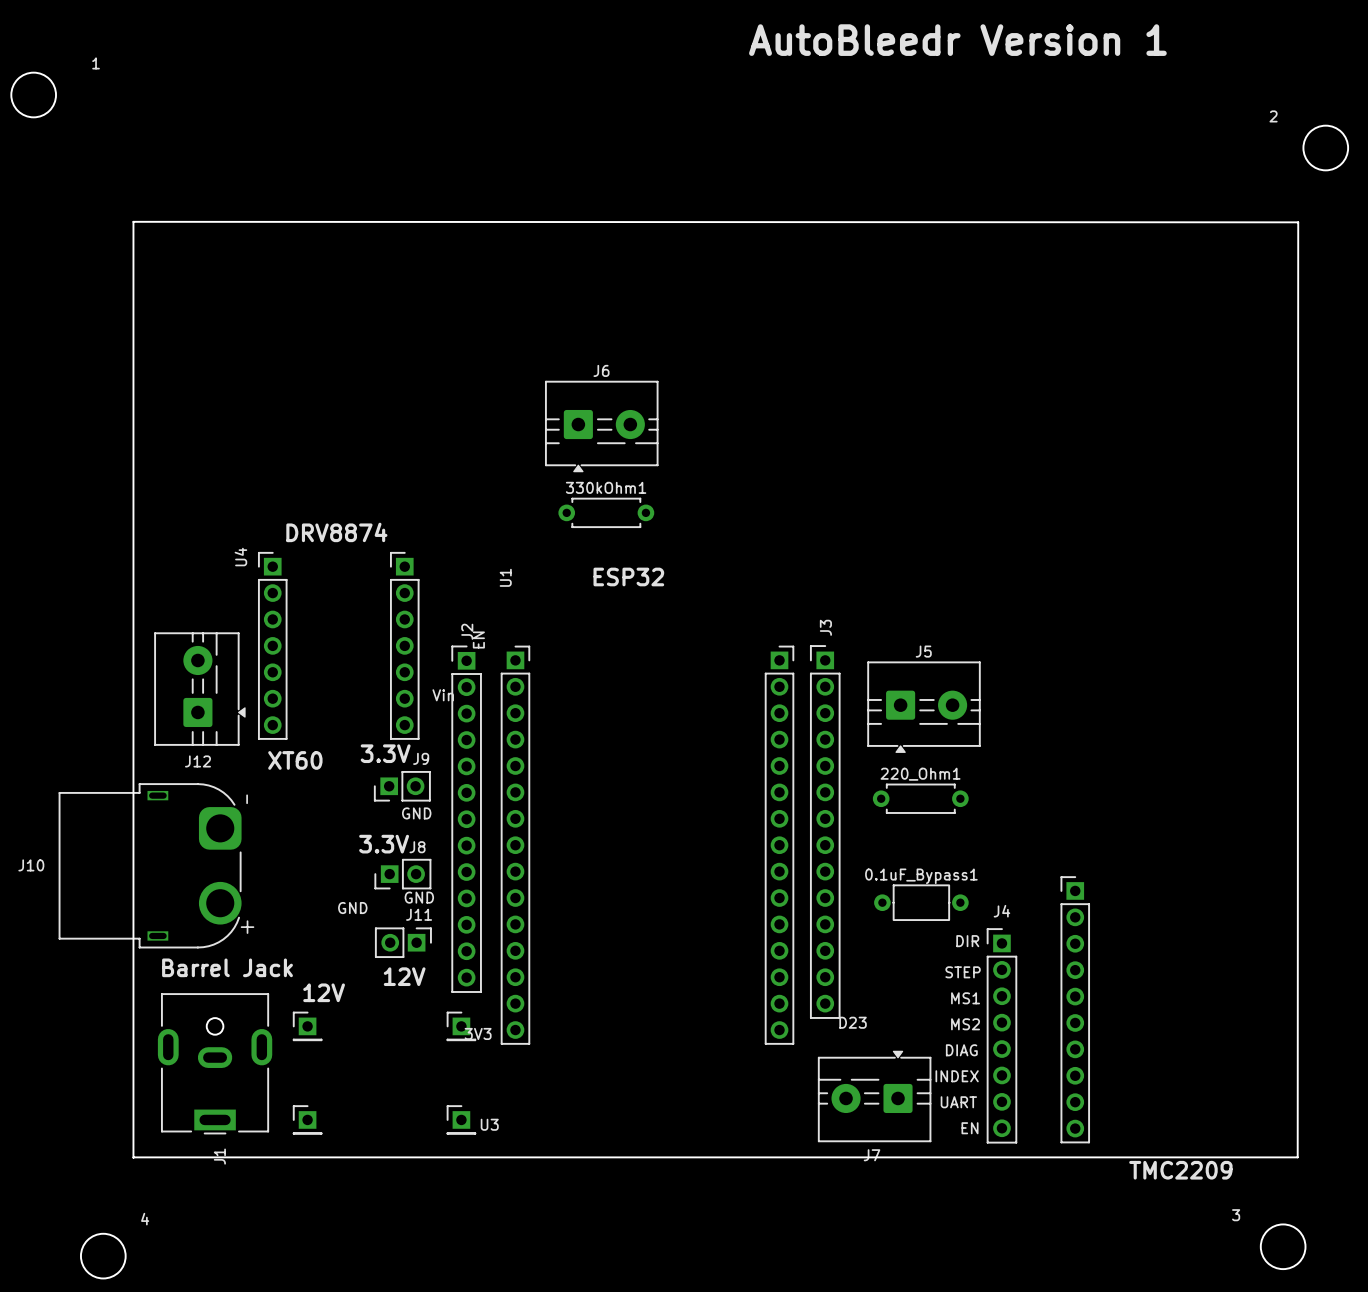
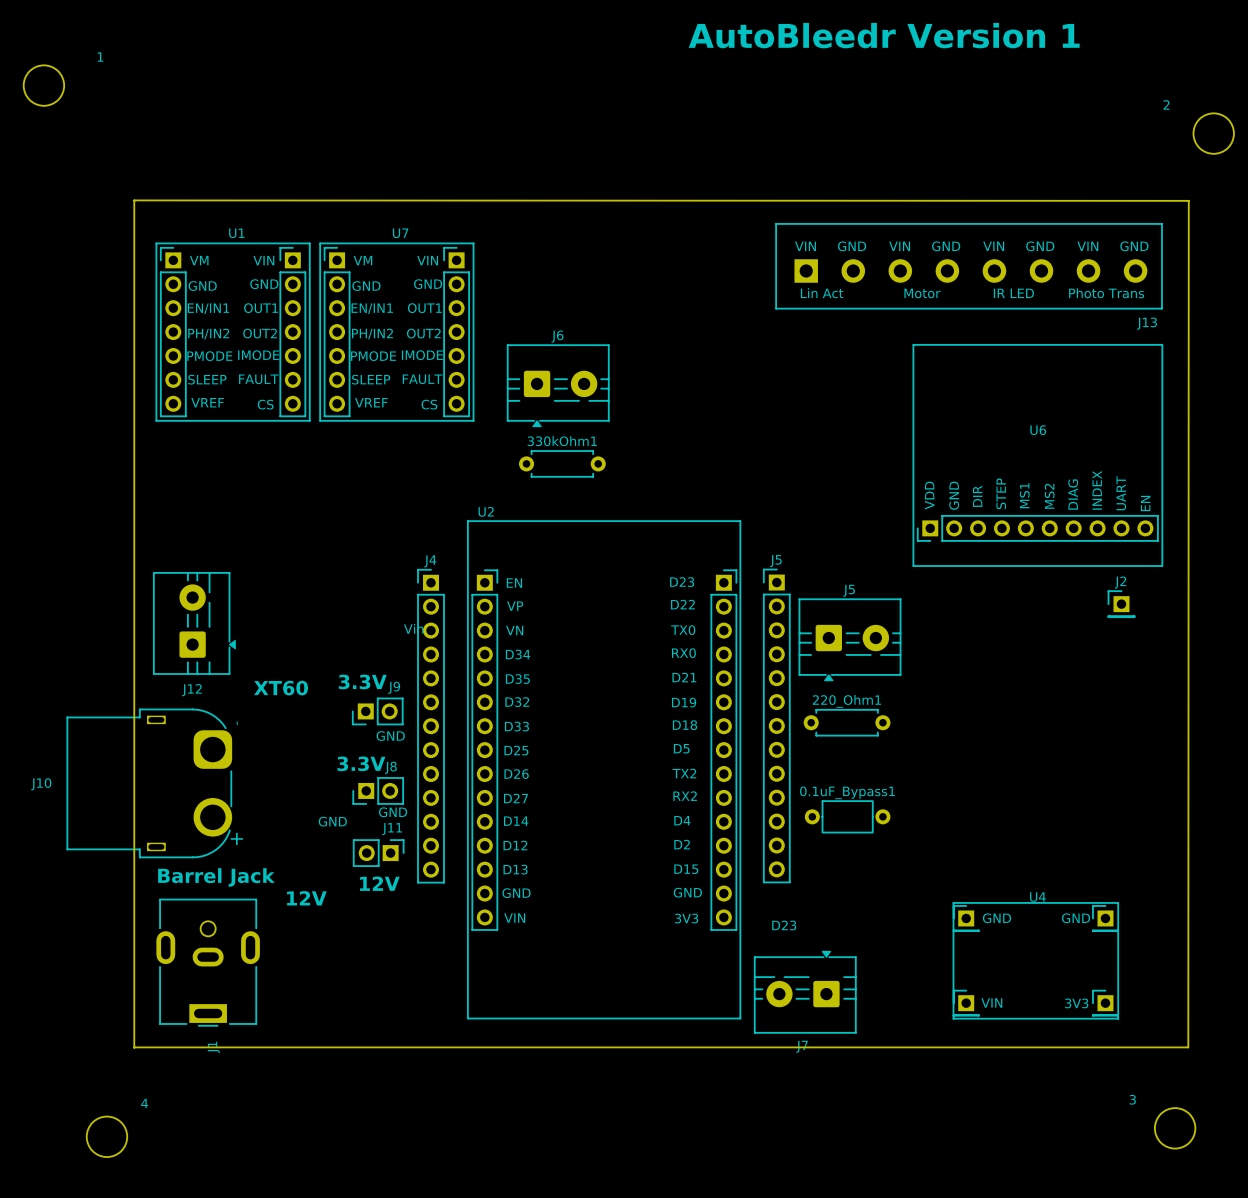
J13: none -> (969, 266)
U7: none -> (396, 332)
U6: none -> (1037, 455)
text: DRV8874 (336, 532) -> none
U4 footprint: [258, 552, 420, 740] -> [953, 902, 1119, 1020]
U4 name position: U4 (240, 557) -> U4 (1037, 897)
text: ESP32 (628, 576) -> none
U1 name position: U1 (505, 577) -> U1 (236, 233)
J2 name position: J2 (467, 631) -> J2 (1120, 582)
J2 footprint: [451, 645, 482, 993] -> [1107, 590, 1136, 618]
U1 footprint: [501, 645, 794, 1045] -> [155, 242, 311, 422]
J5: none -> (776, 725)
J3: (825, 832) -> none
U2: none -> (604, 769)
J4 name position: J4 (1001, 911) -> J4 (430, 561)
J4 footprint: [986, 928, 1017, 1144] -> [417, 569, 445, 884]
text: DIR (967, 941) -> none
text: STEP (963, 972) -> none
text: MS1 (965, 998) -> none
part: (1075, 1009) -> none
text: MS2 (965, 1024) -> none
text: 3V3 (478, 1033) -> none
text: DIAG (961, 1050) -> none
U3: (384, 1073) -> none
text: INDEX (957, 1076) -> none
text: UART (958, 1102) -> none
text: EN (970, 1128) -> none
text: TMC2209 (1180, 1170) -> none

